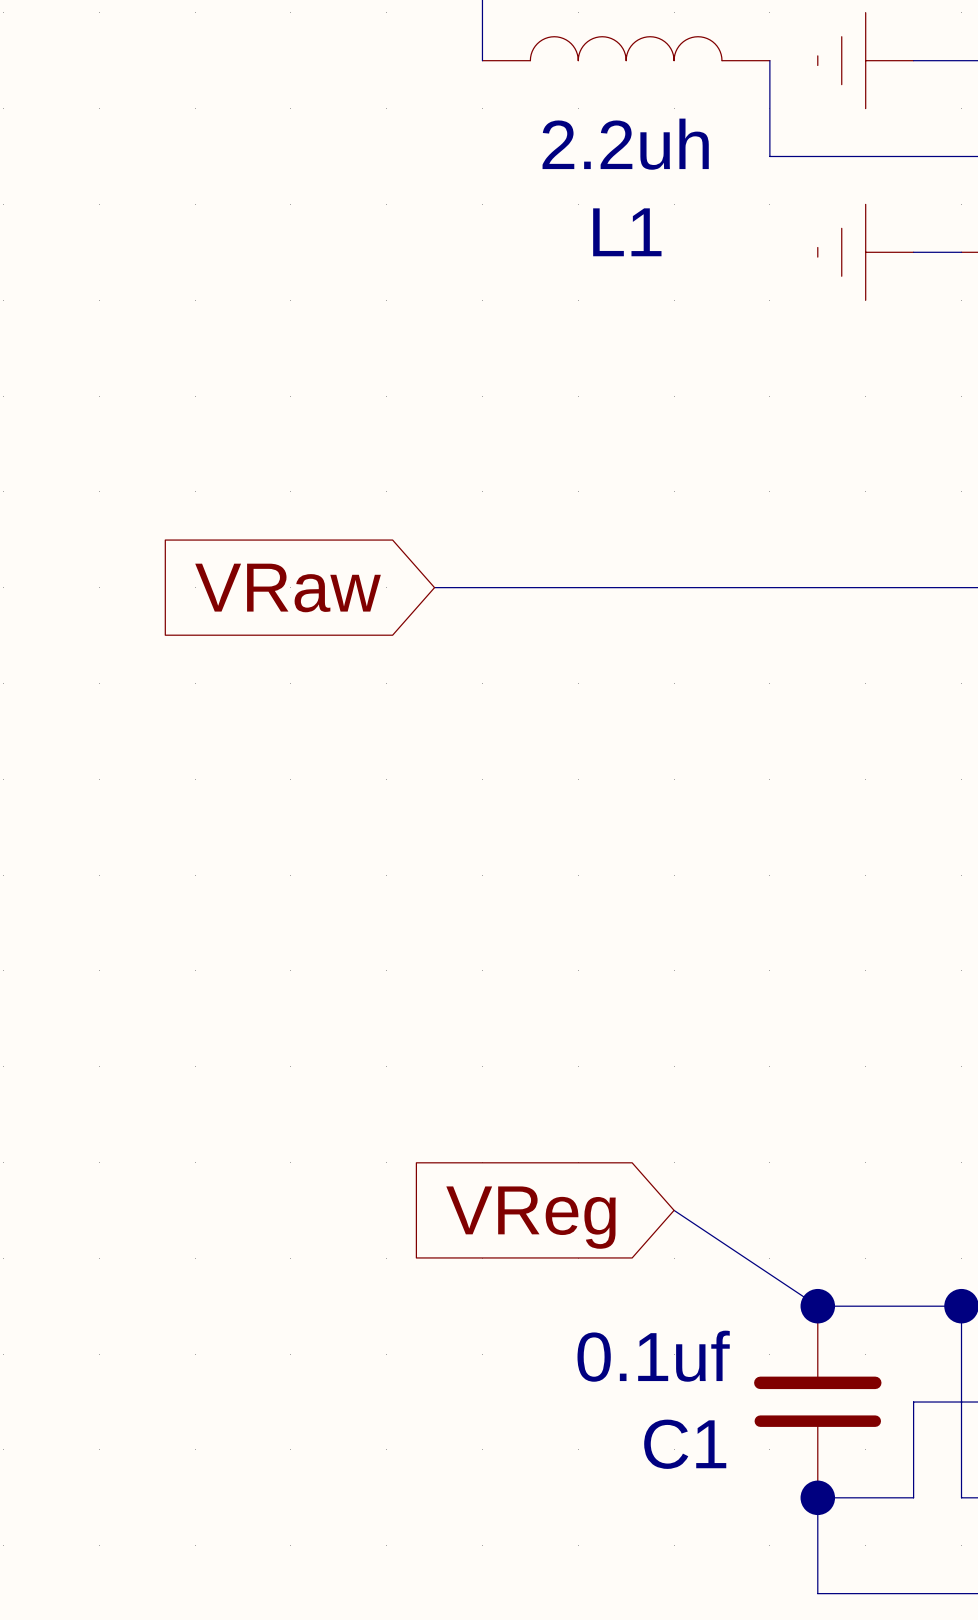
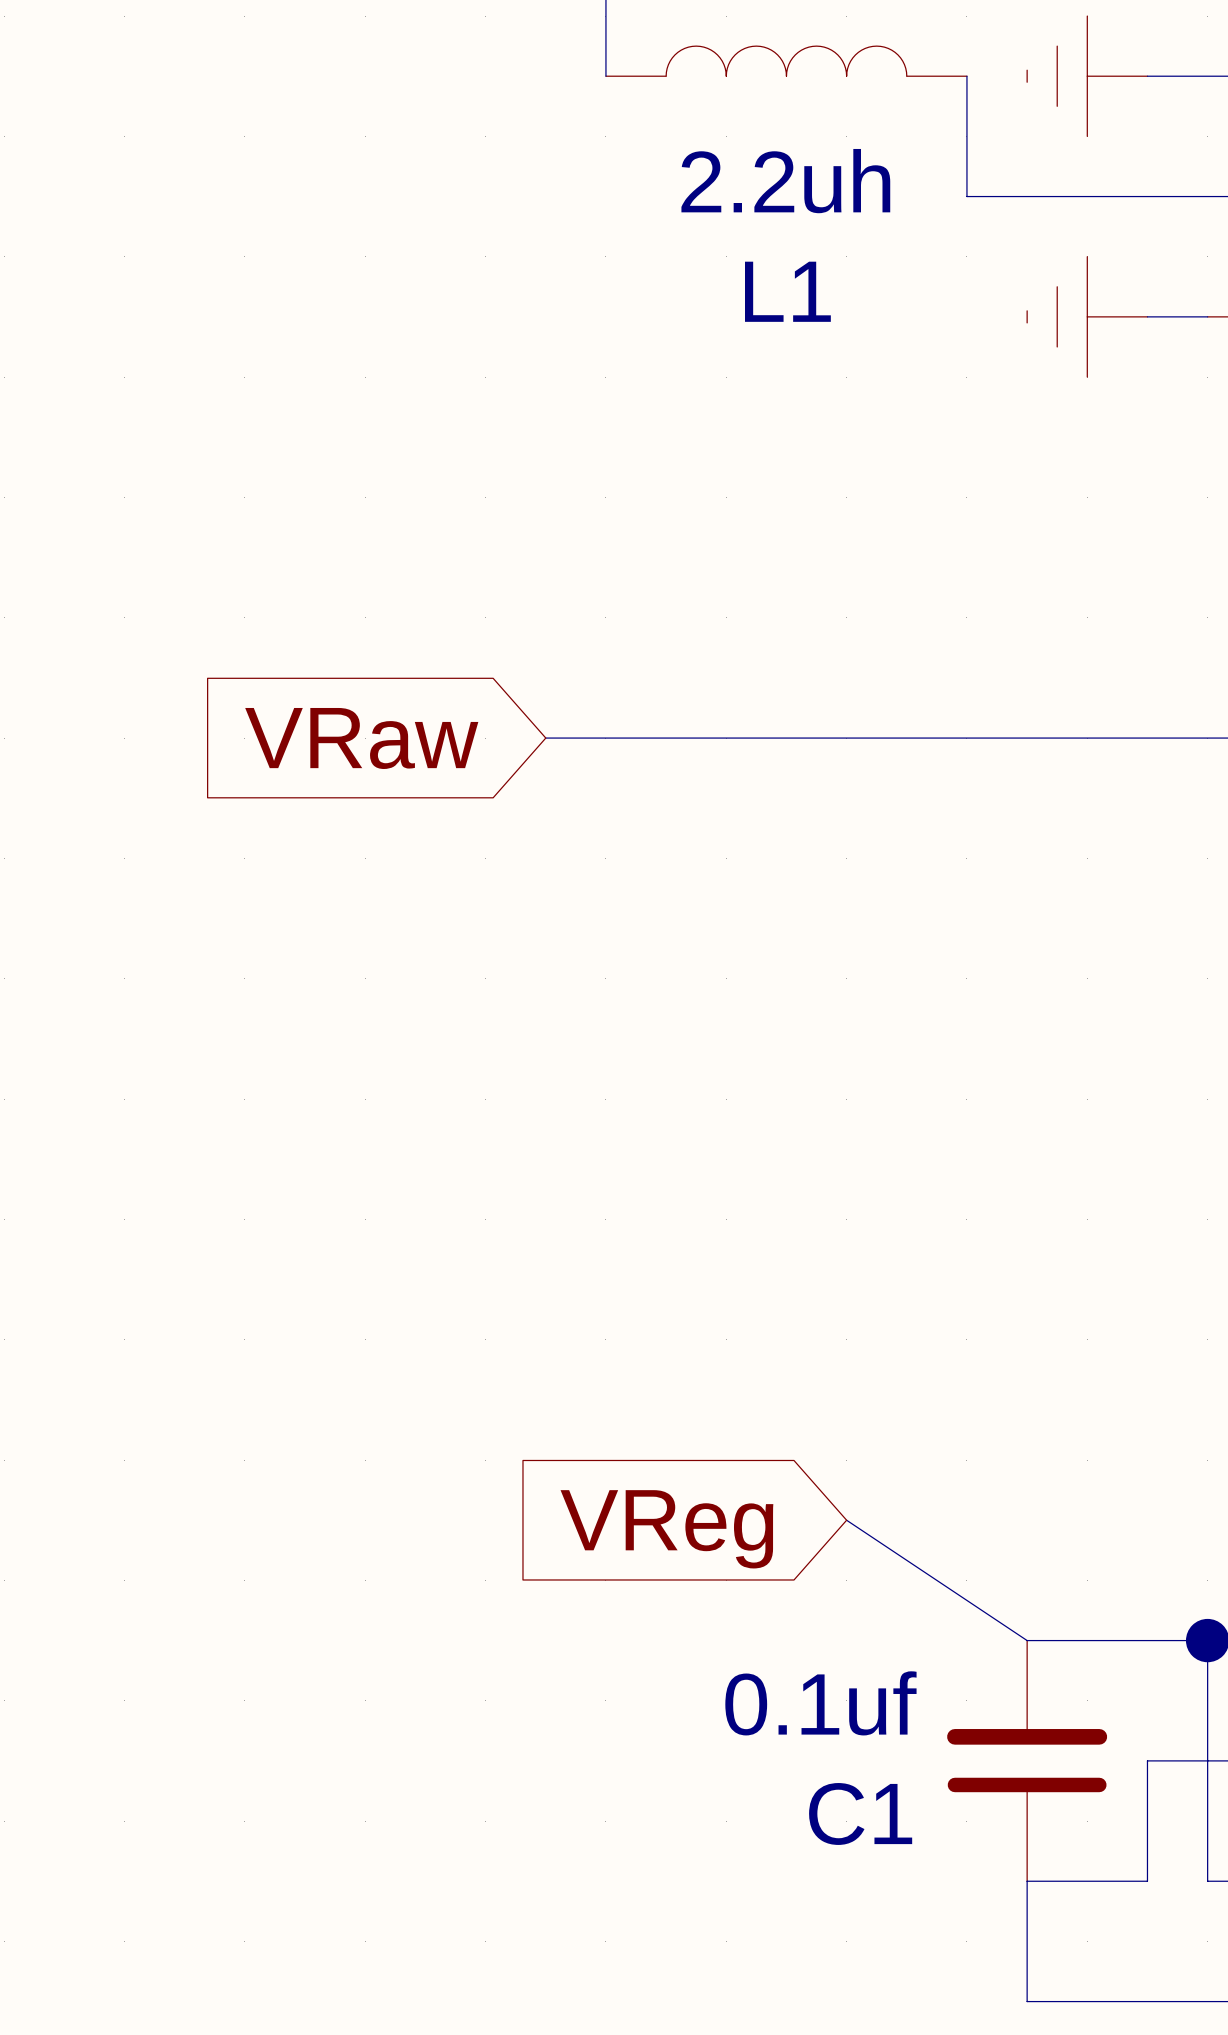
junction: (817, 1306) -> none
junction: (817, 1497) -> none

